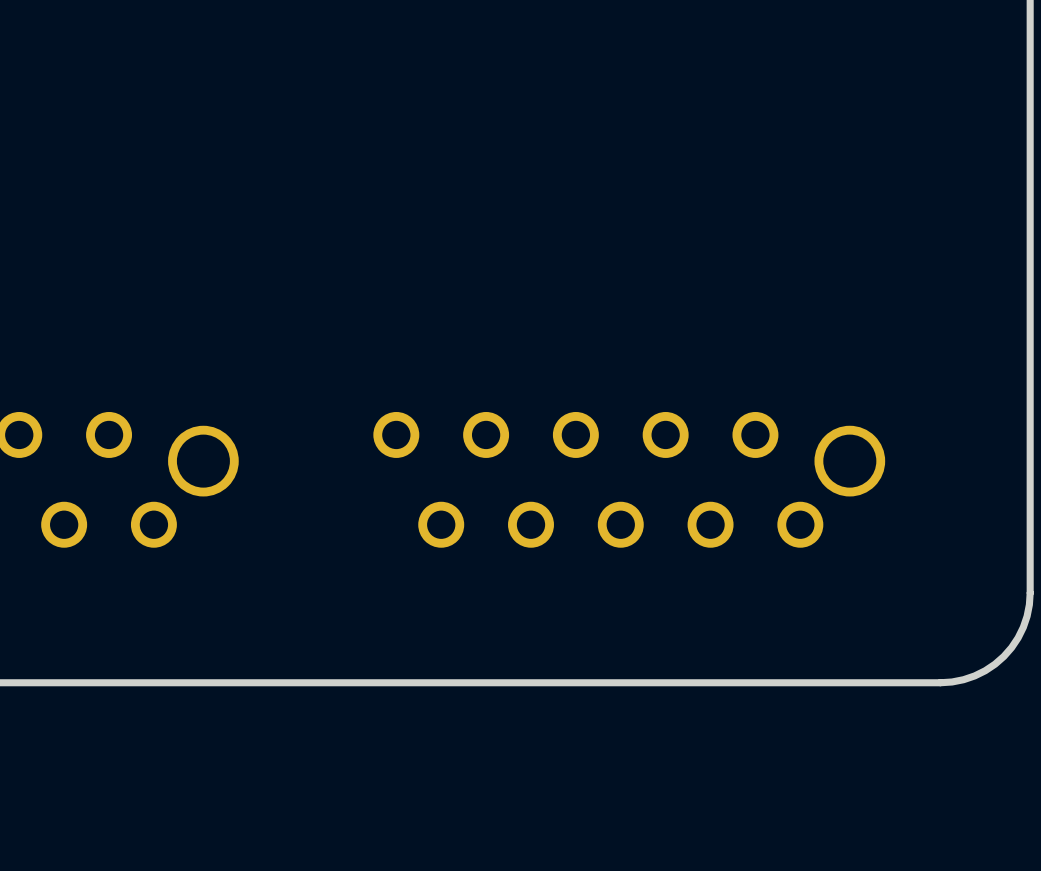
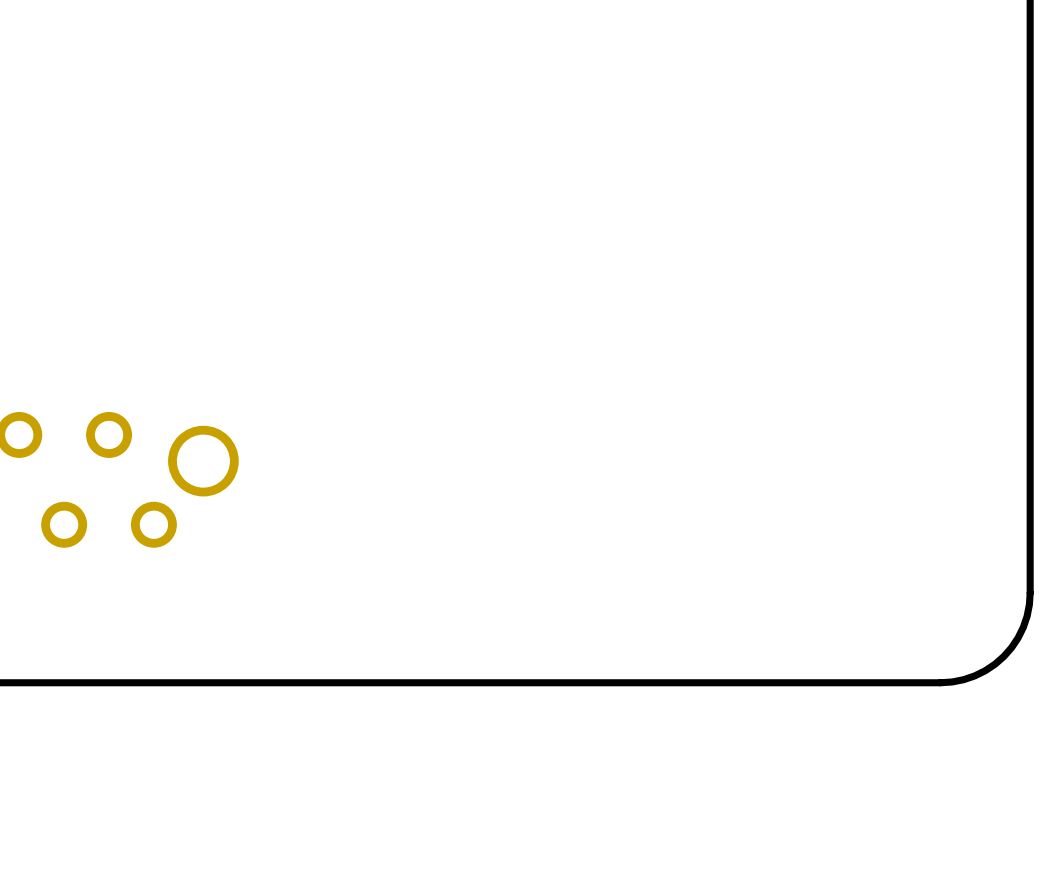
part: (629, 479) -> none

